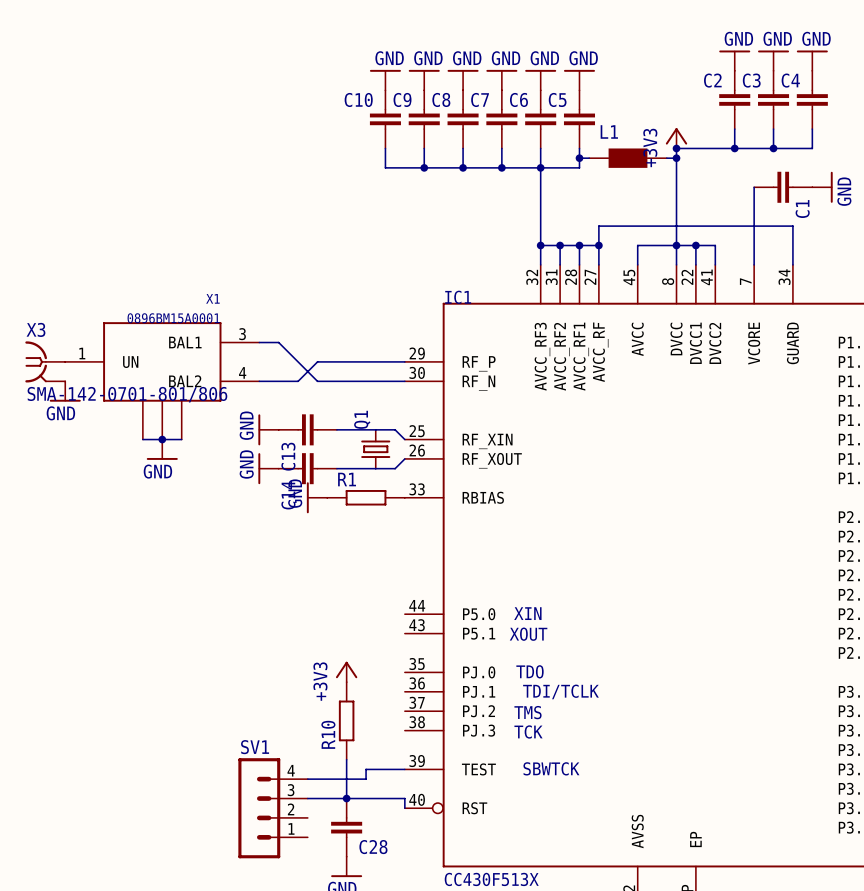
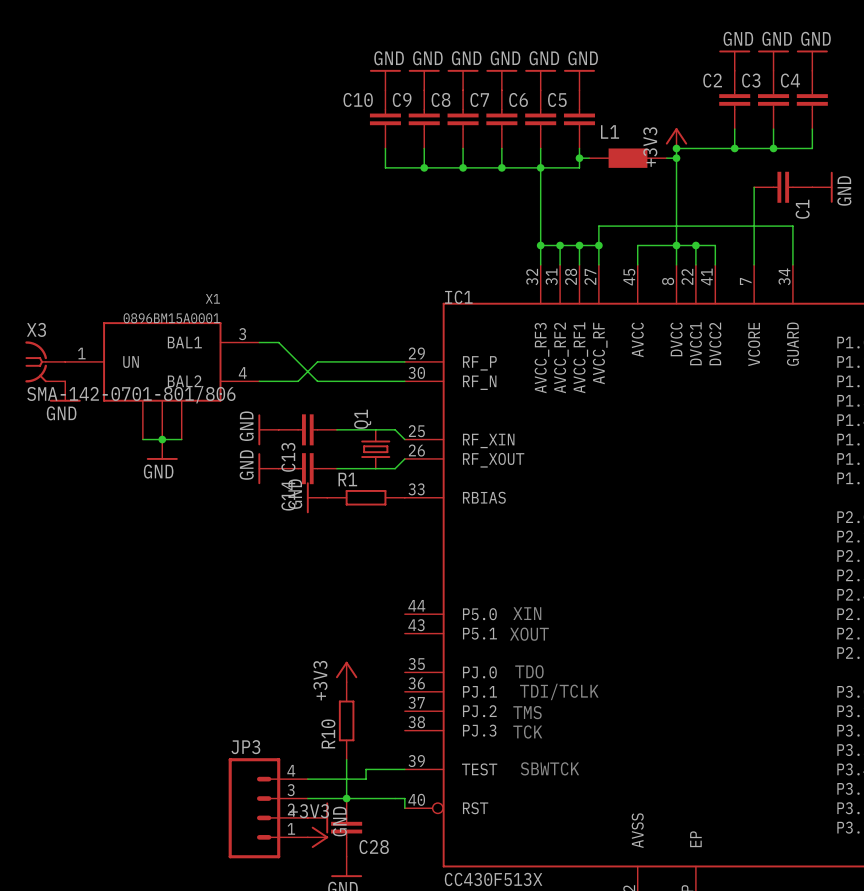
JP3: none -> (268, 808)
SV1: (273, 808) -> none
power symbol: none -> GND (318, 817)
power symbol: none -> +3V3 (318, 837)

